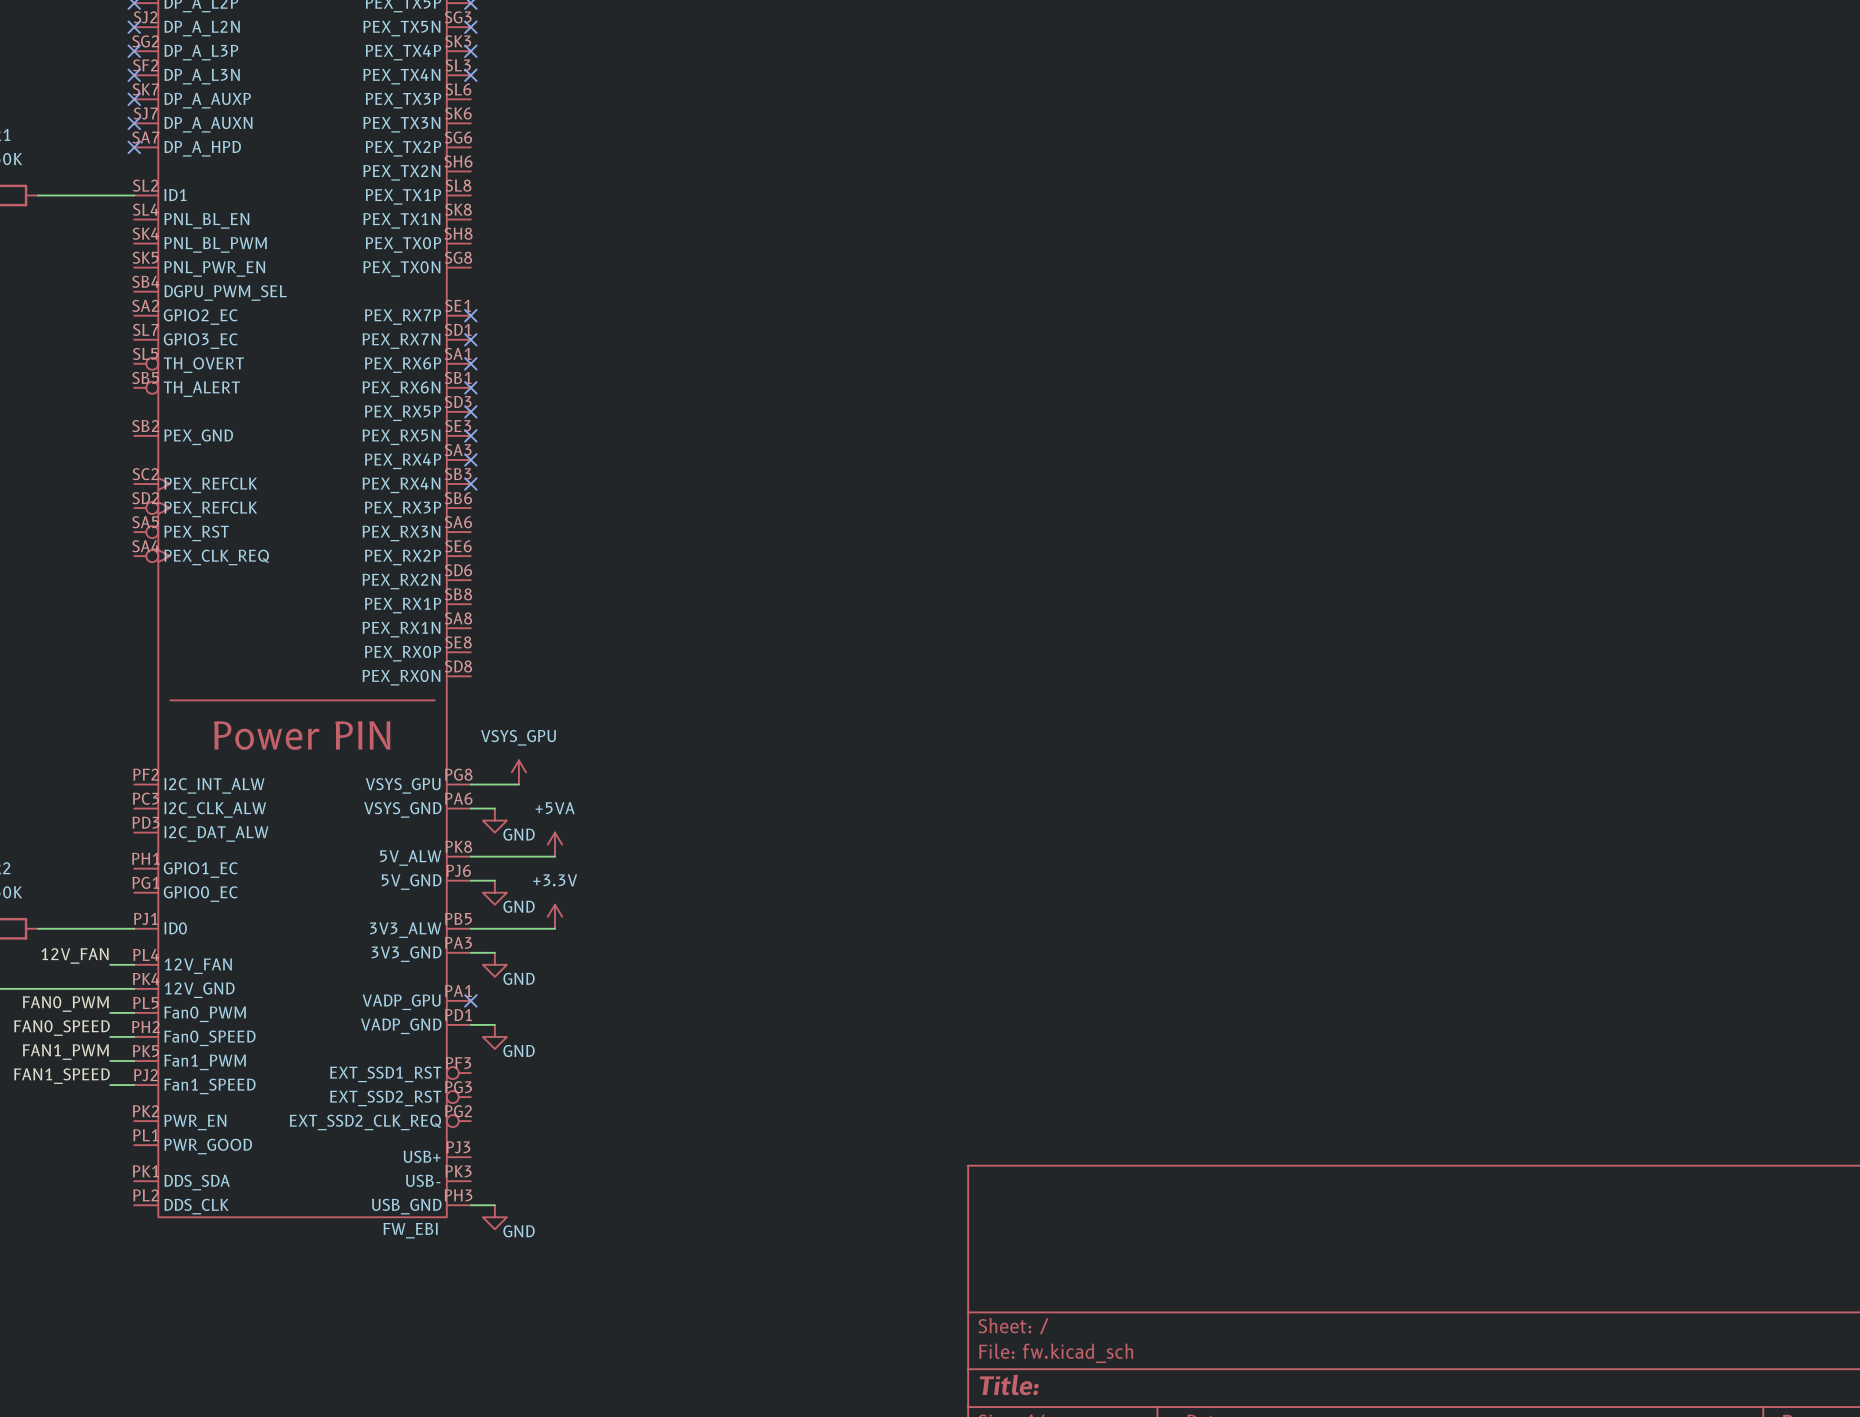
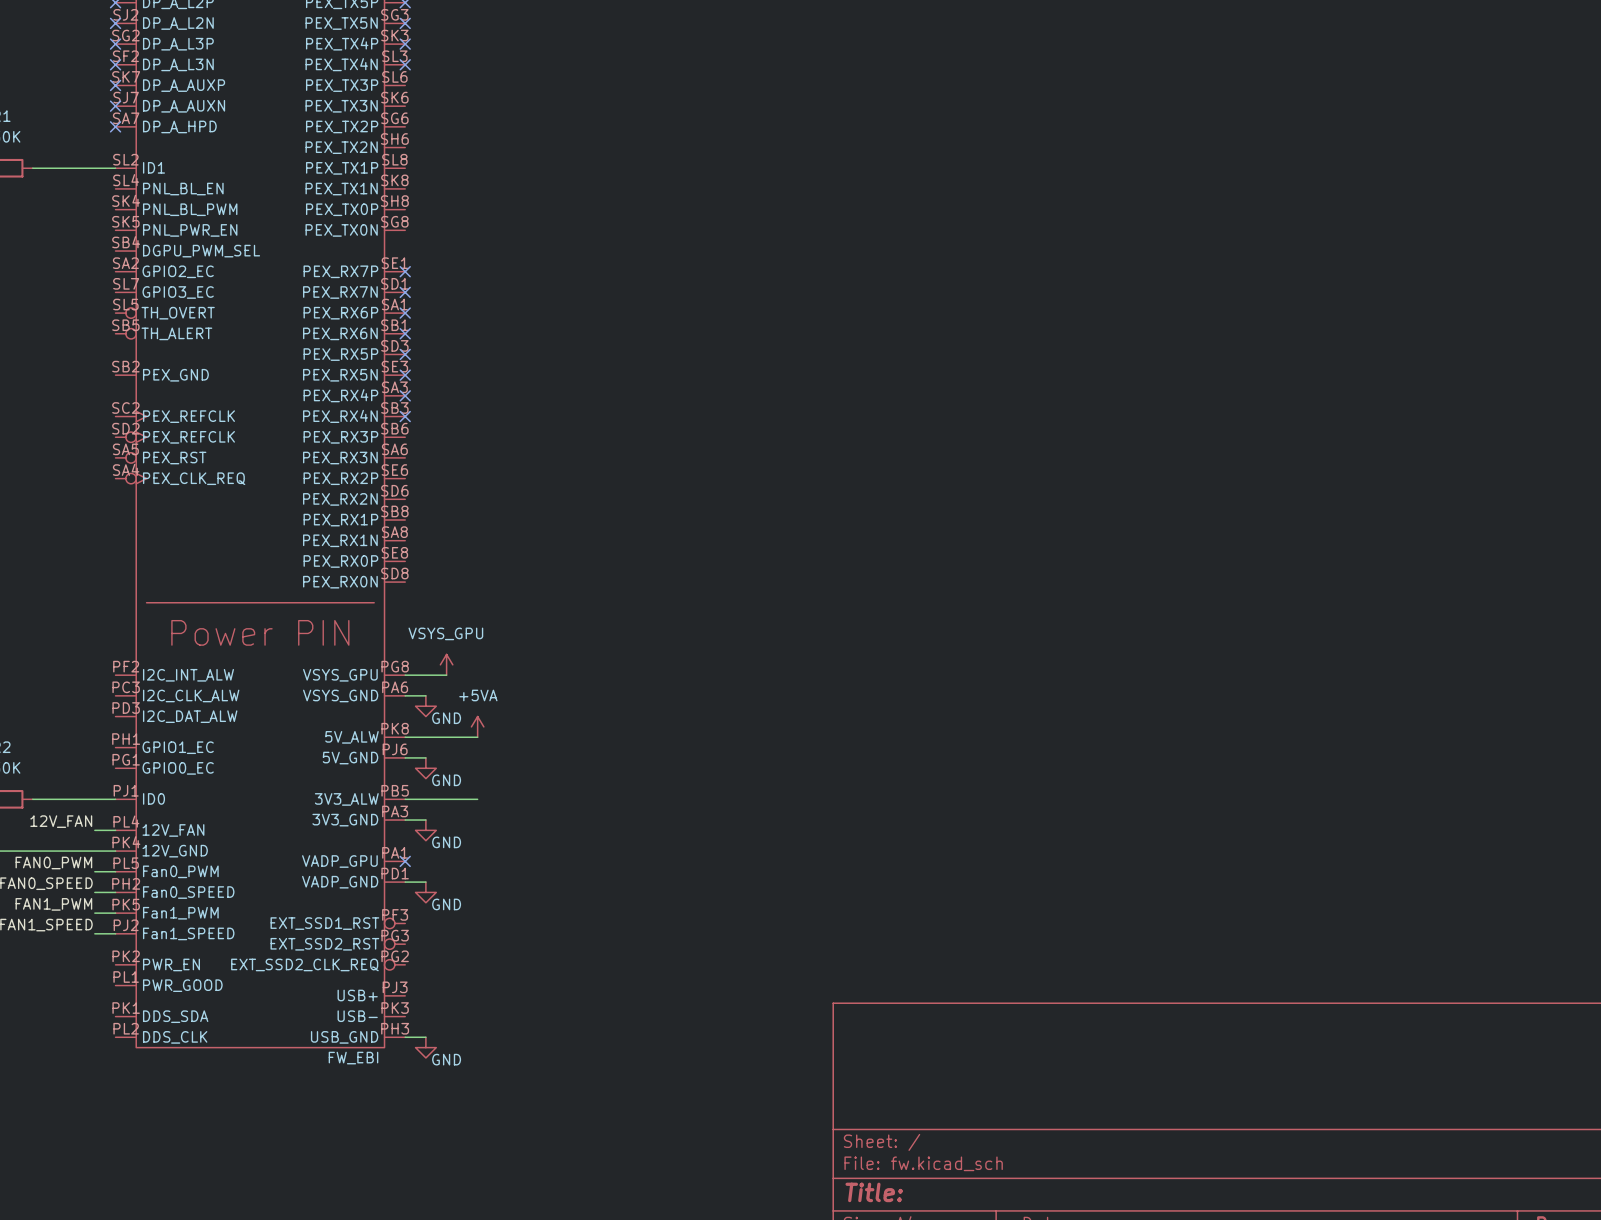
power symbol: +3.3V (554, 916) -> none

